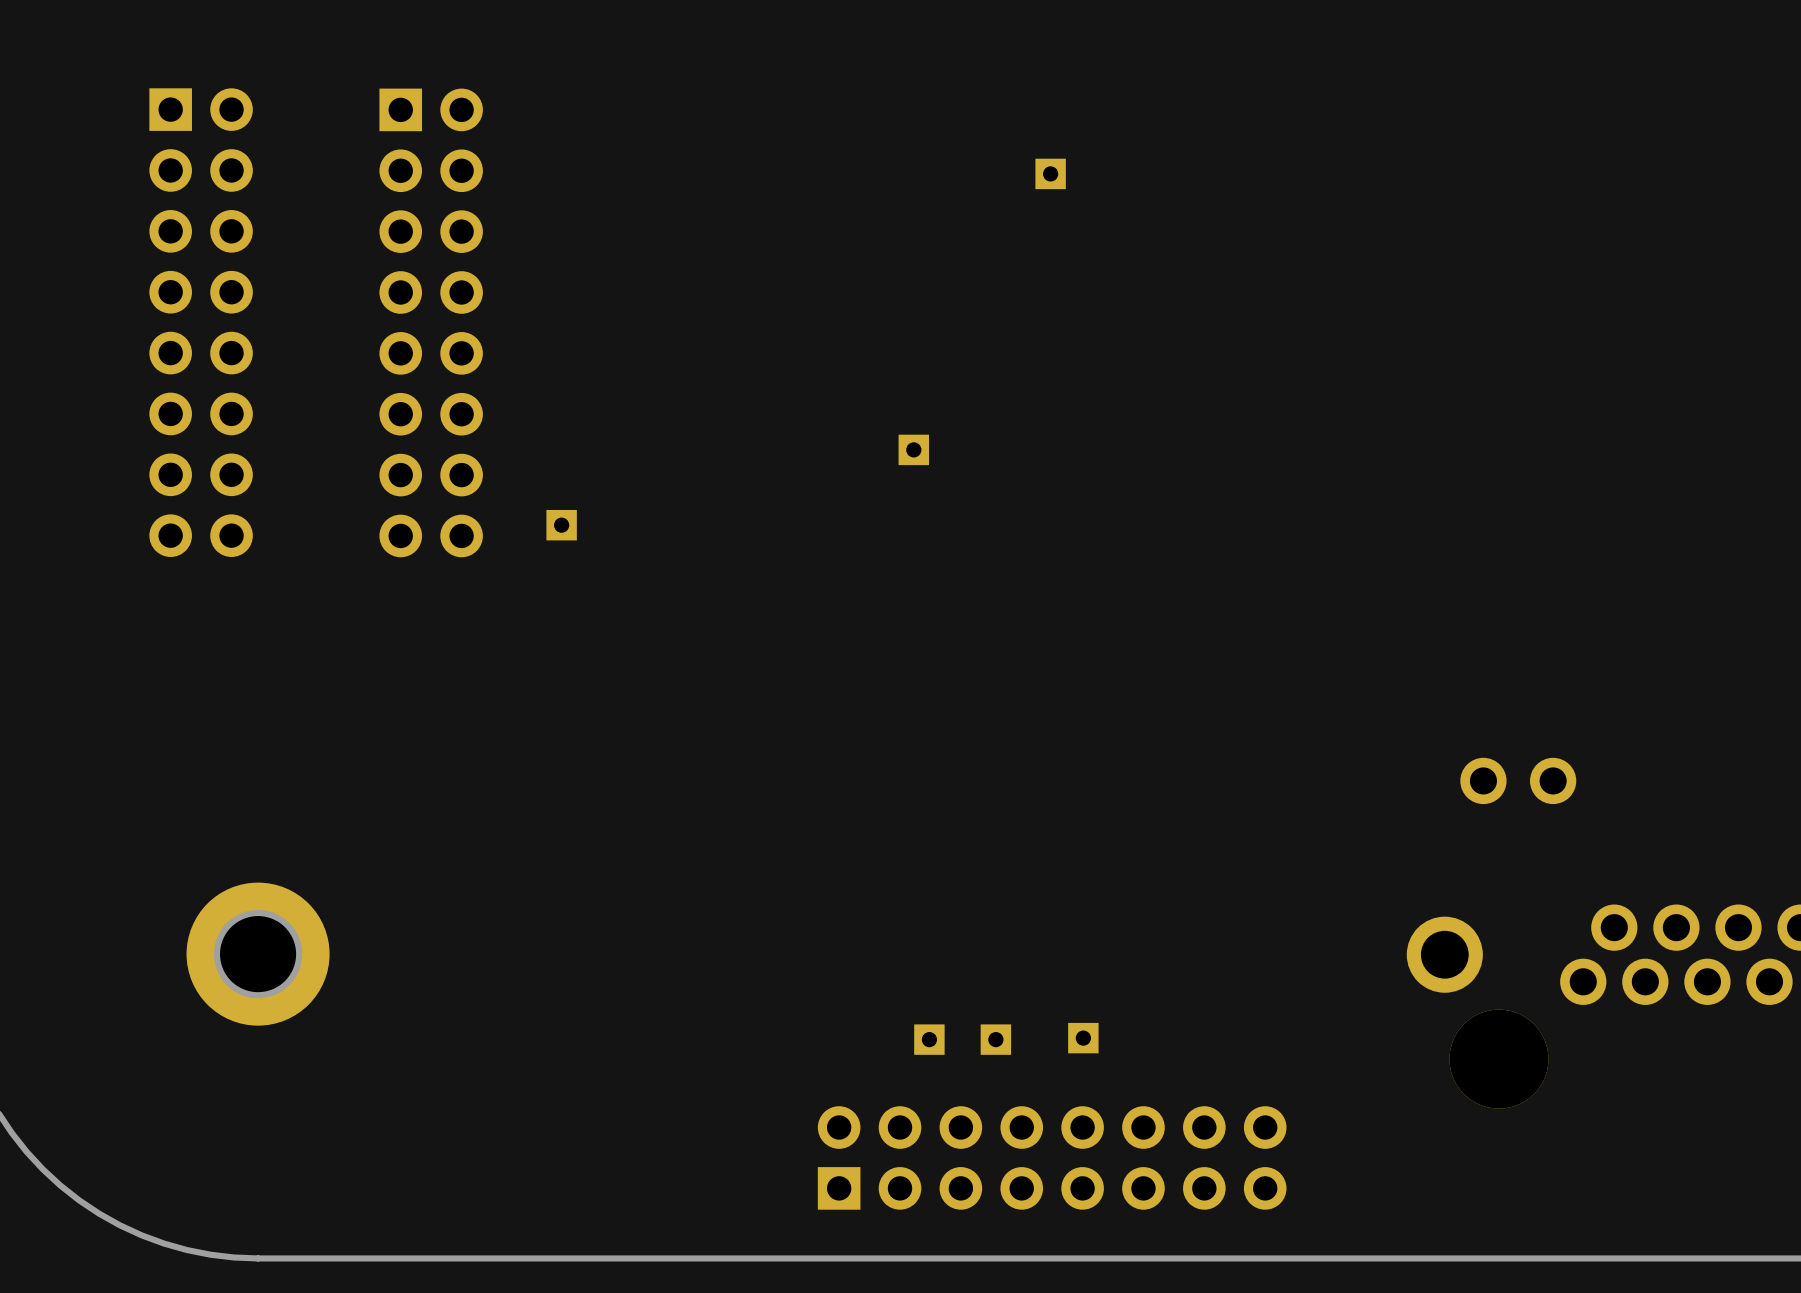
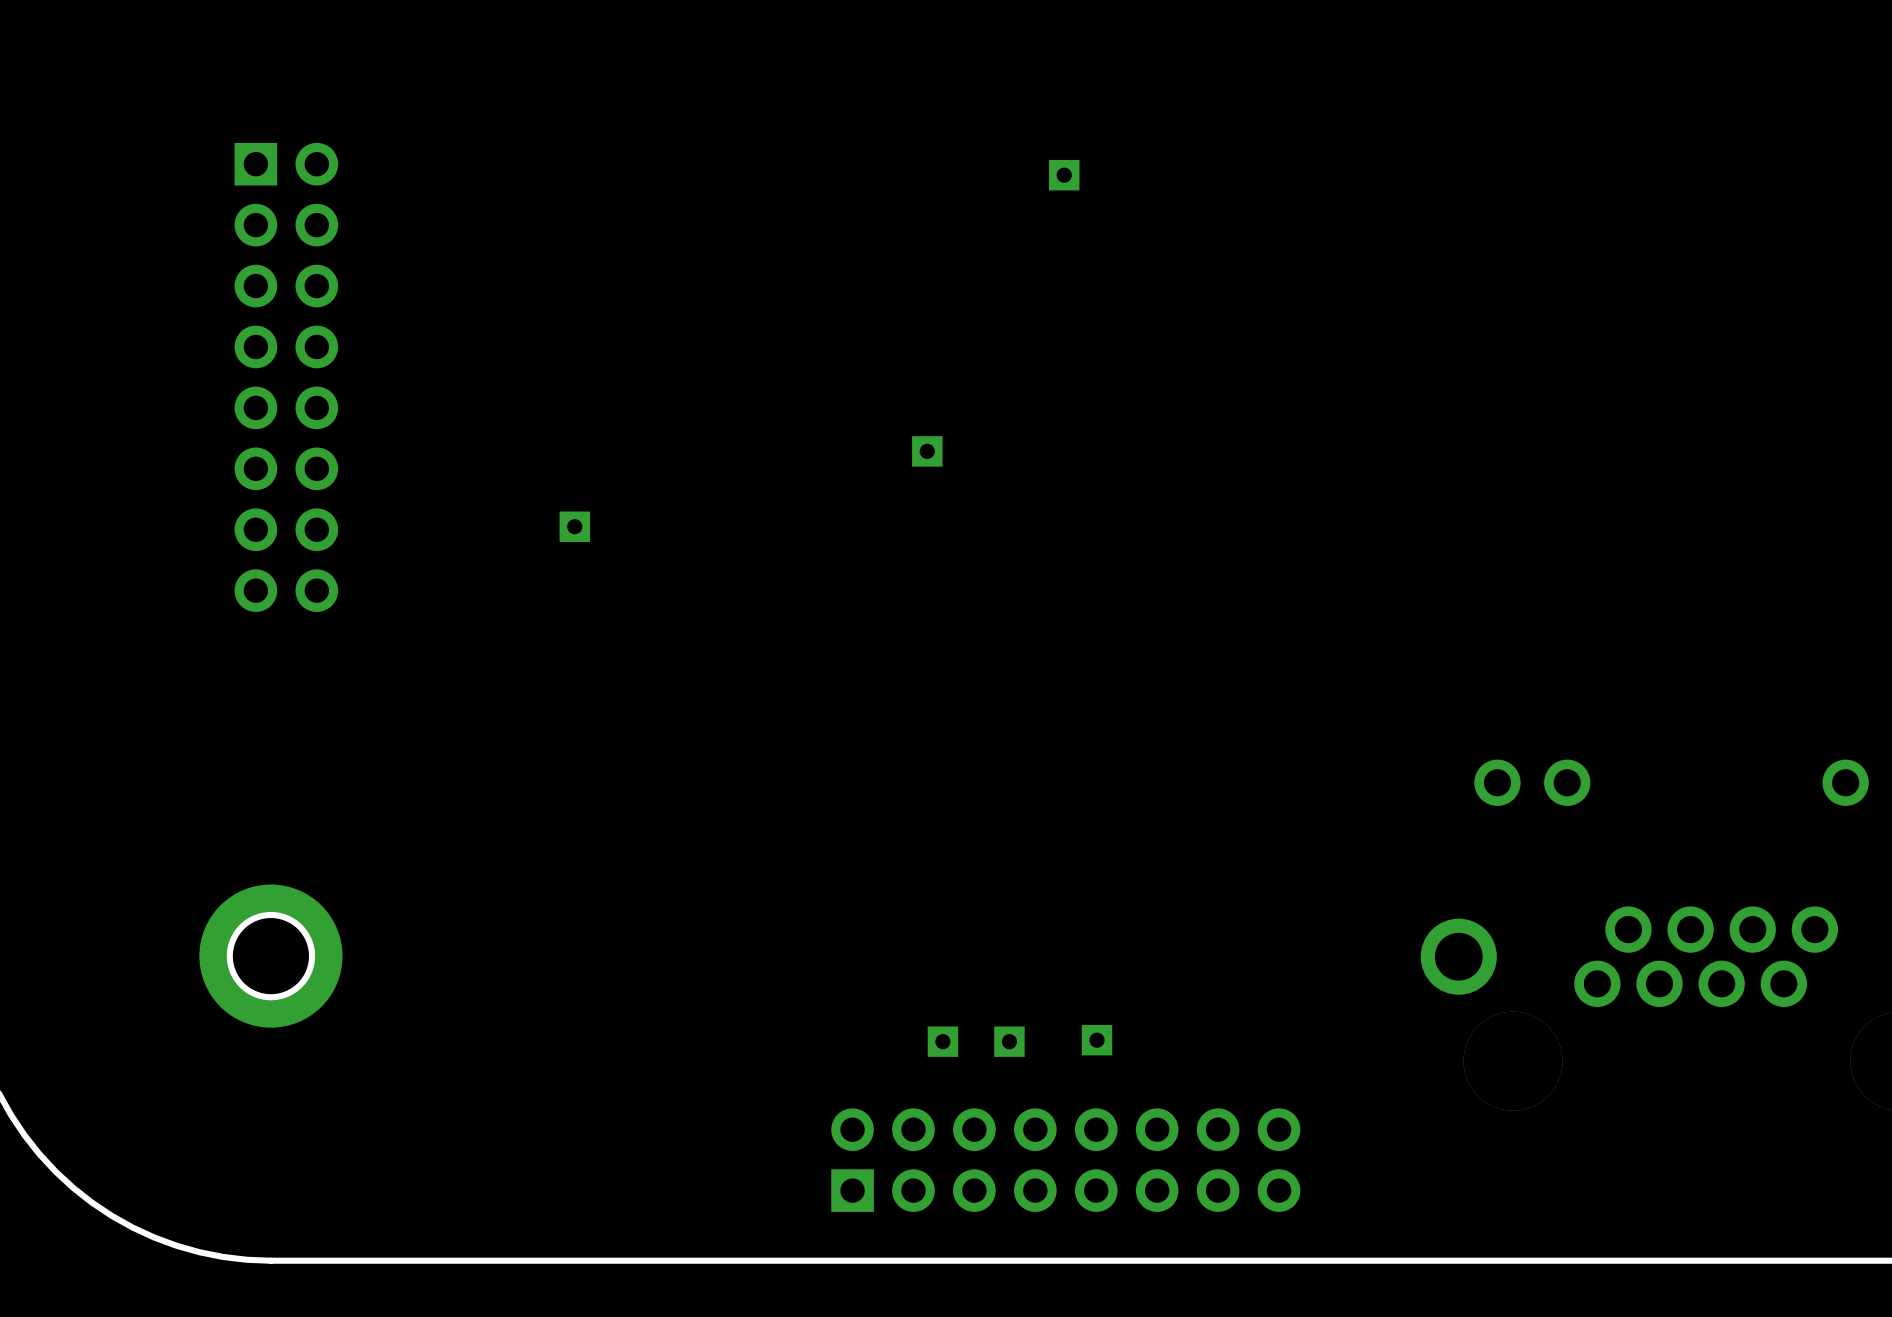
part: (201, 322) -> none
part: (431, 322) -> none
part: none -> (286, 377)

